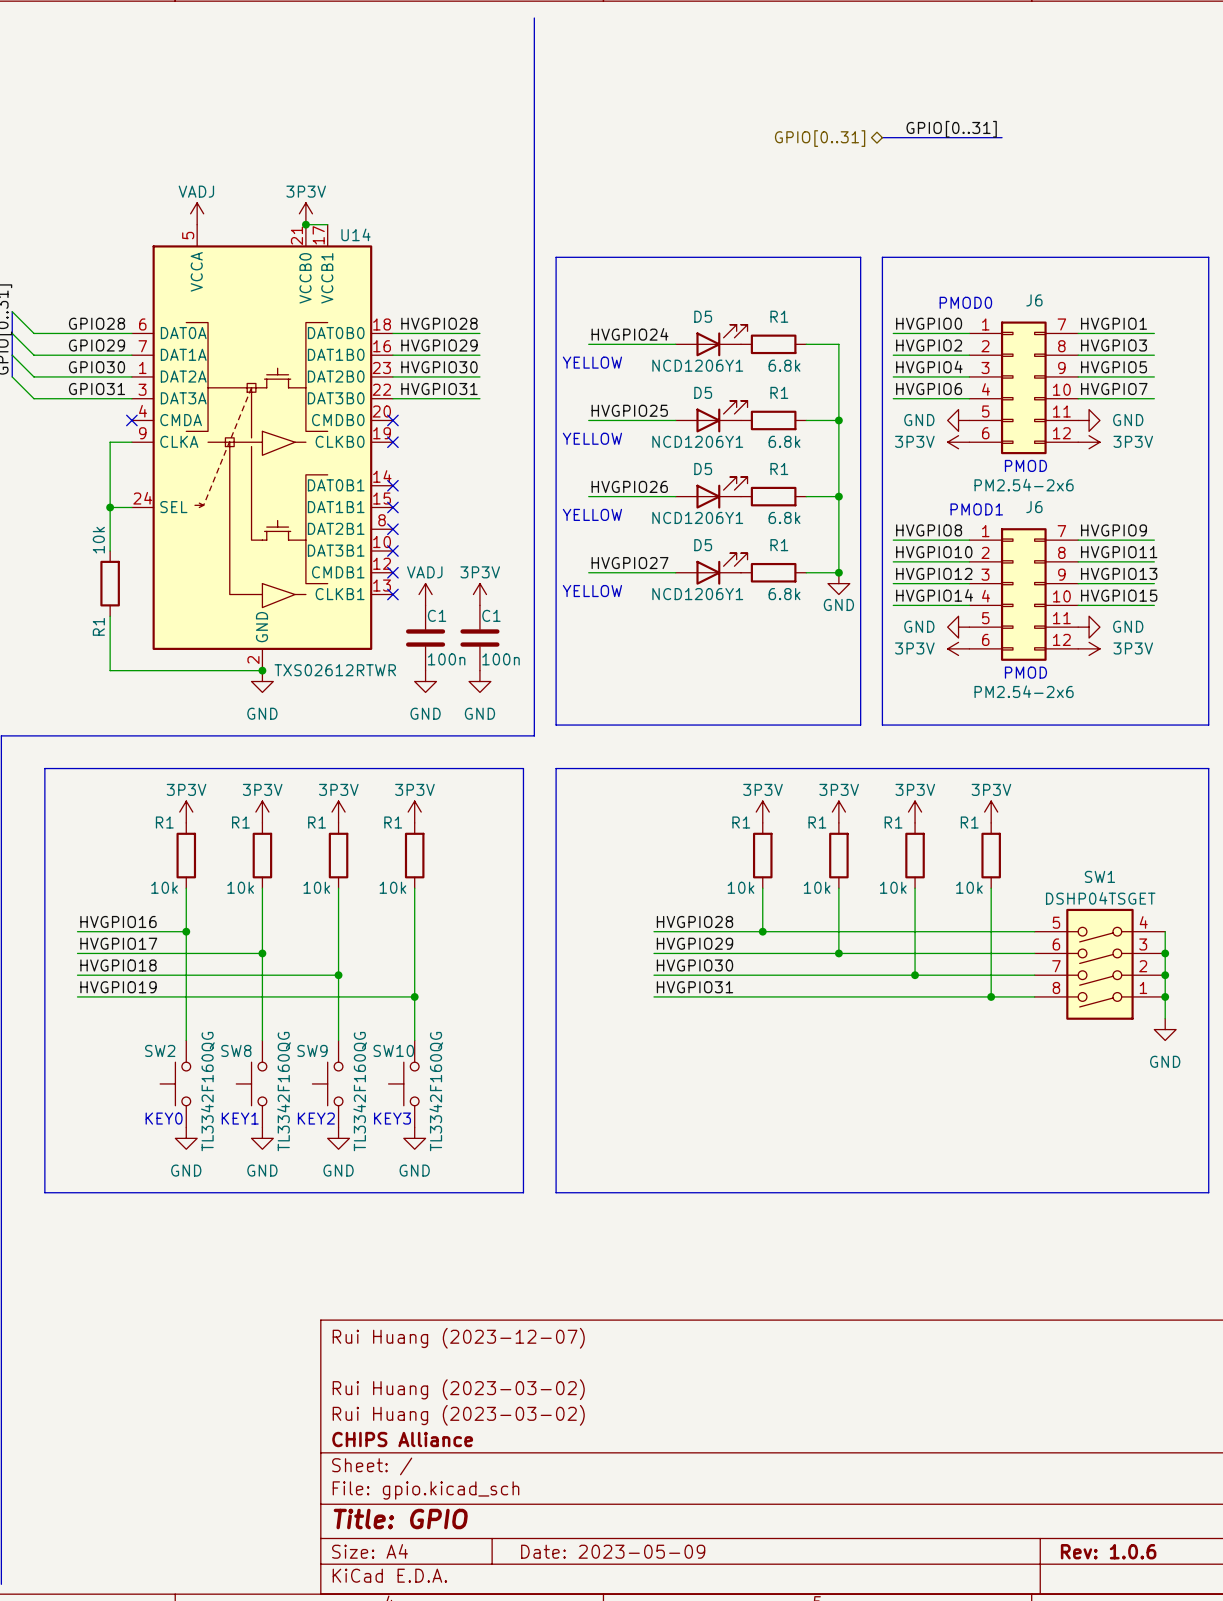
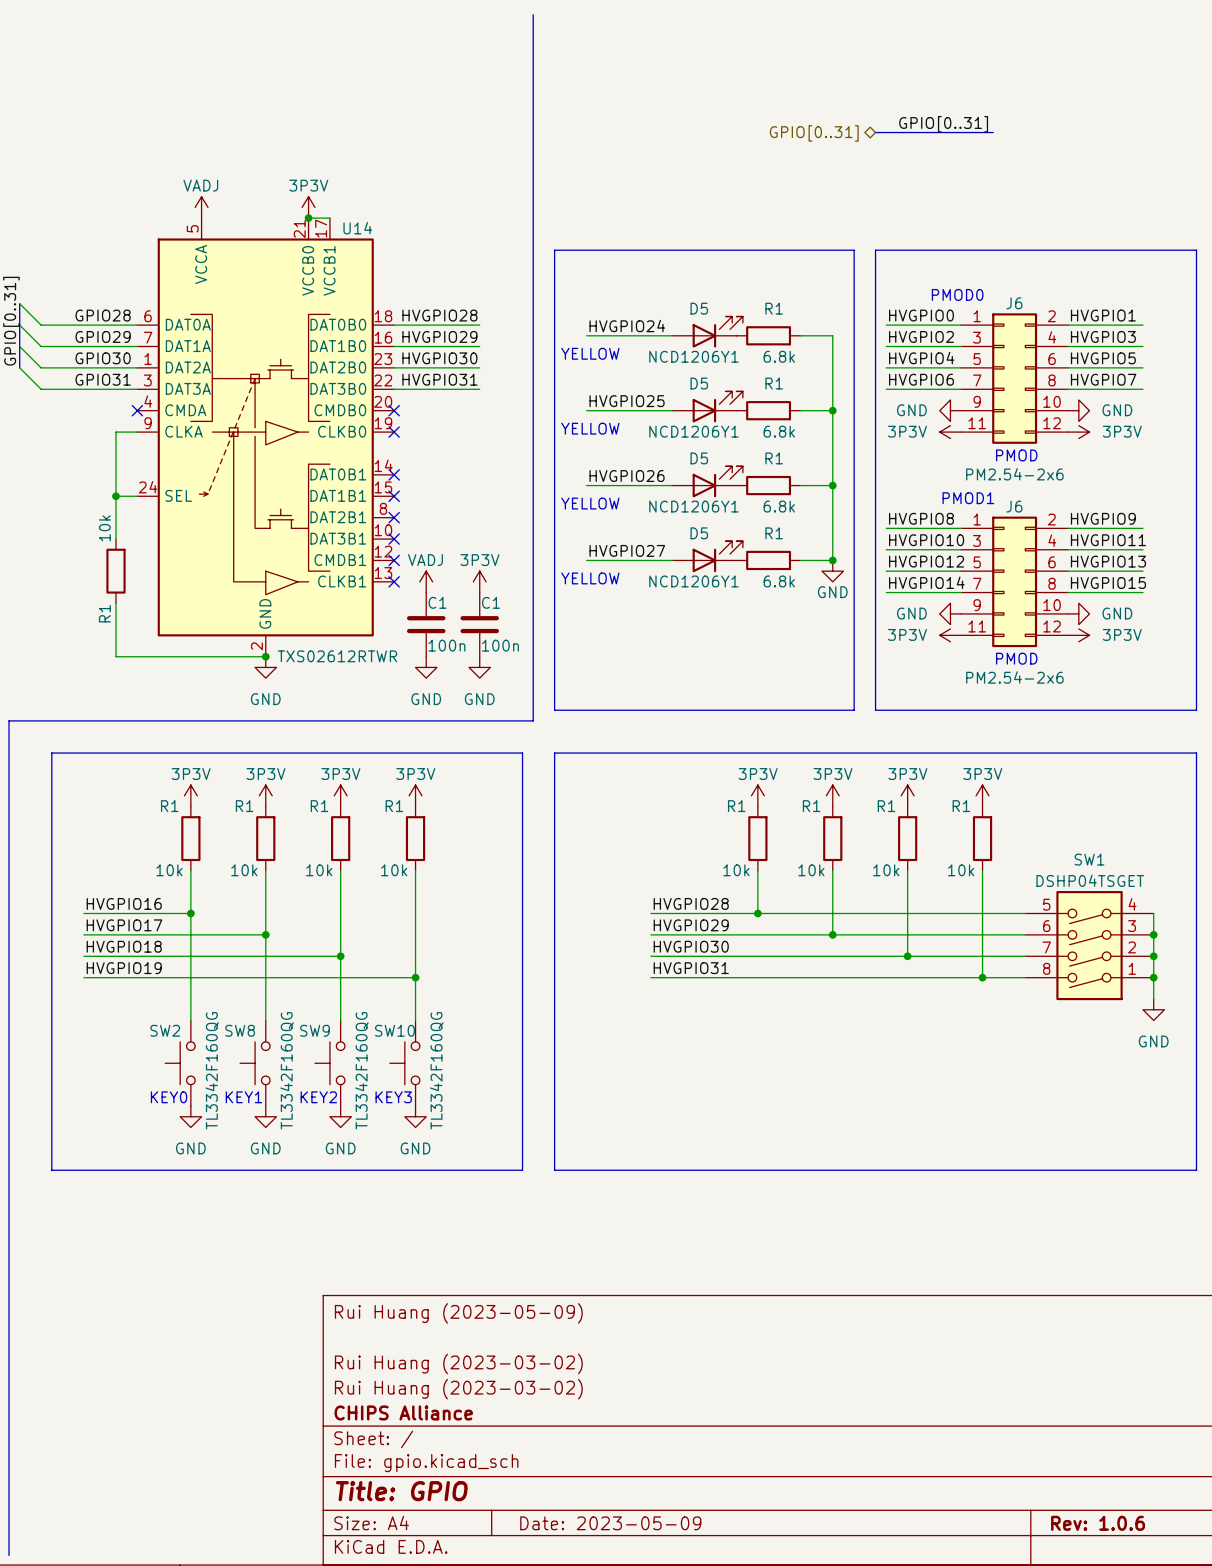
J6 symbol: [969, 321, 1079, 455] -> [961, 313, 1069, 444]
J6 symbol: [969, 528, 1079, 661] -> [961, 516, 1069, 648]
title block: Rui Huang (2023-12-07) (458, 1338) -> Rui Huang (2023-05-09) (458, 1313)

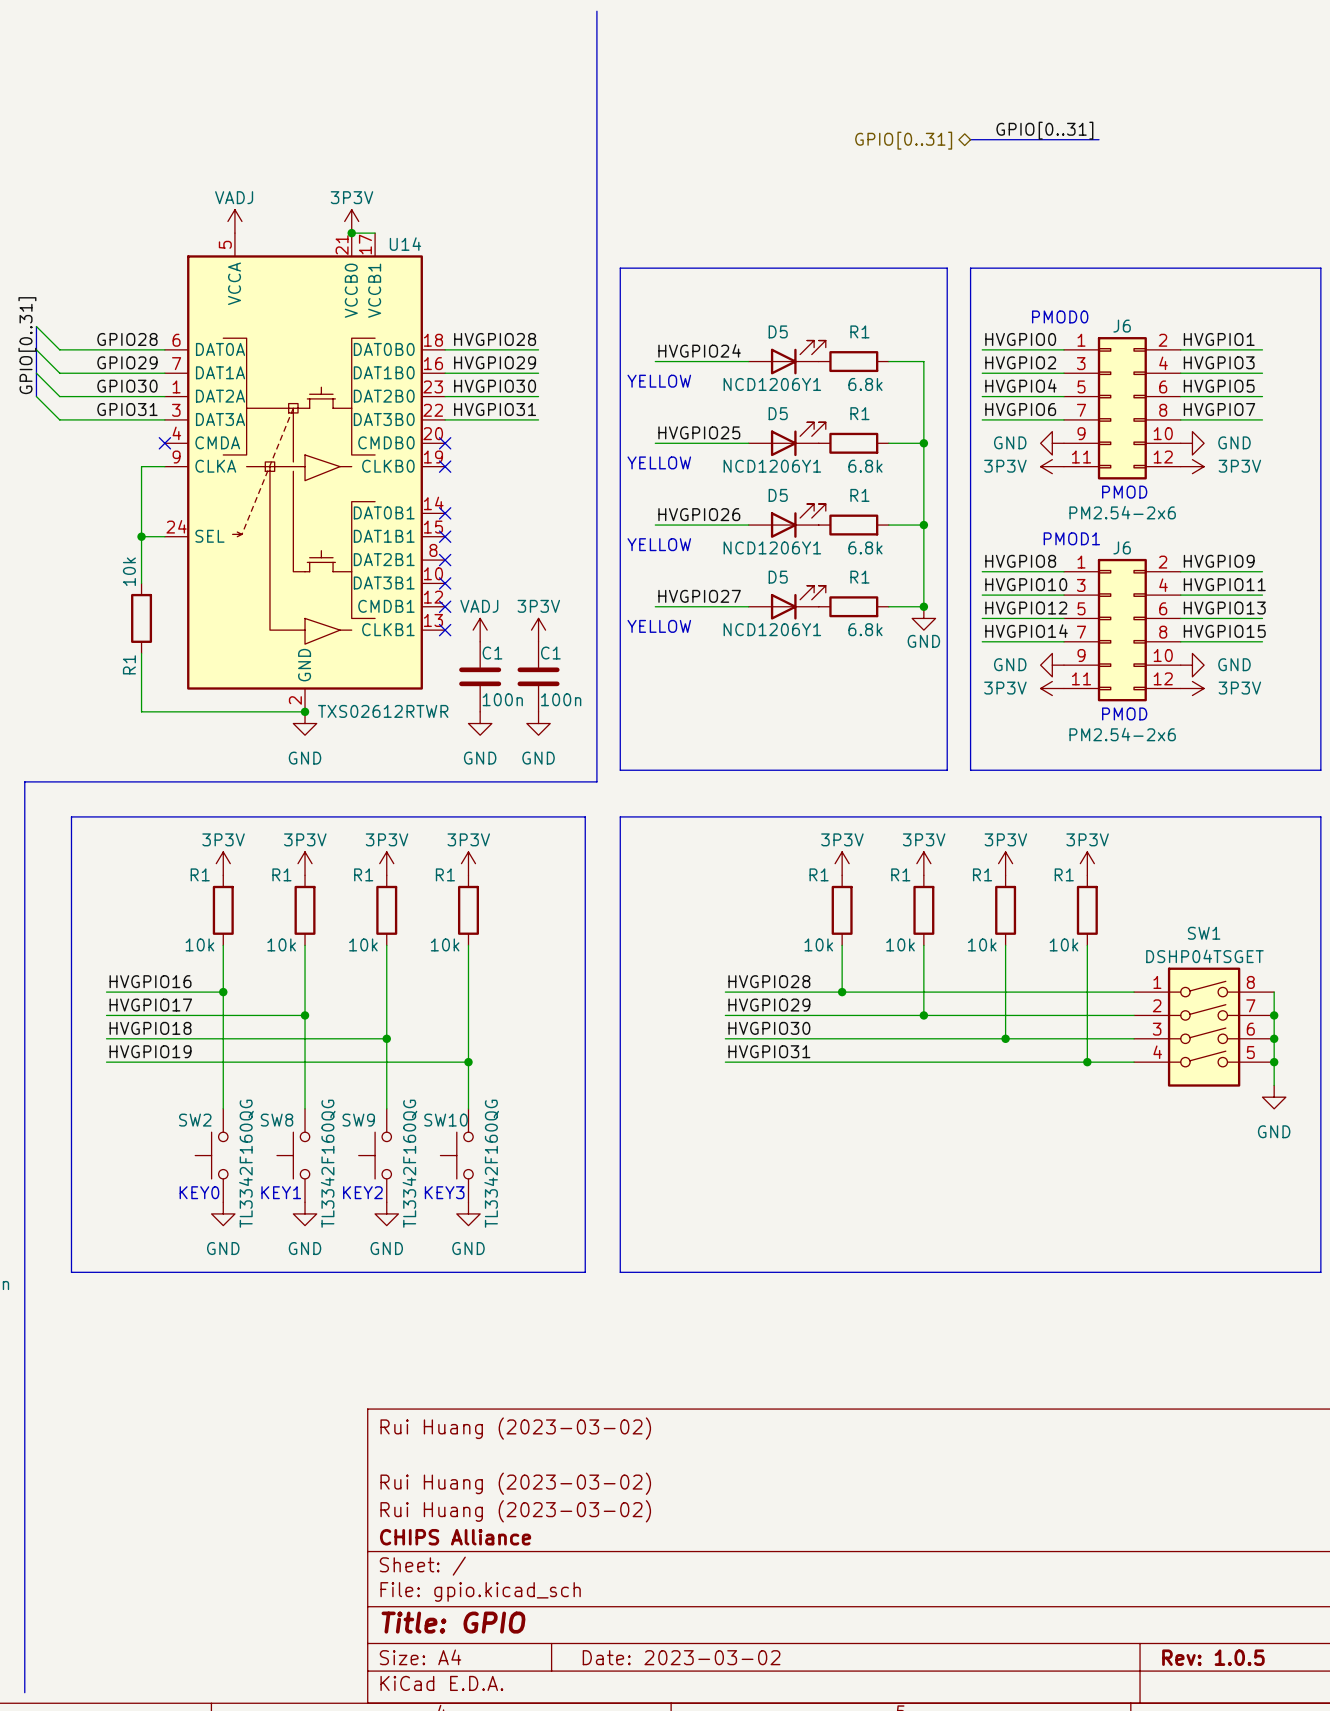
SW1 rotation: 0° (1089, 945) -> 180° (1204, 1027)
title block: Rui Huang (2023-05-09) (458, 1313) -> Rui Huang (2023-03-02) (515, 1428)
title block: Date: 2023-05-09 (610, 1523) -> Date: 2023-03-02 (681, 1657)
title block: Rev: 1.0.6 (1098, 1523) -> Rev: 1.0.5 (1213, 1657)

